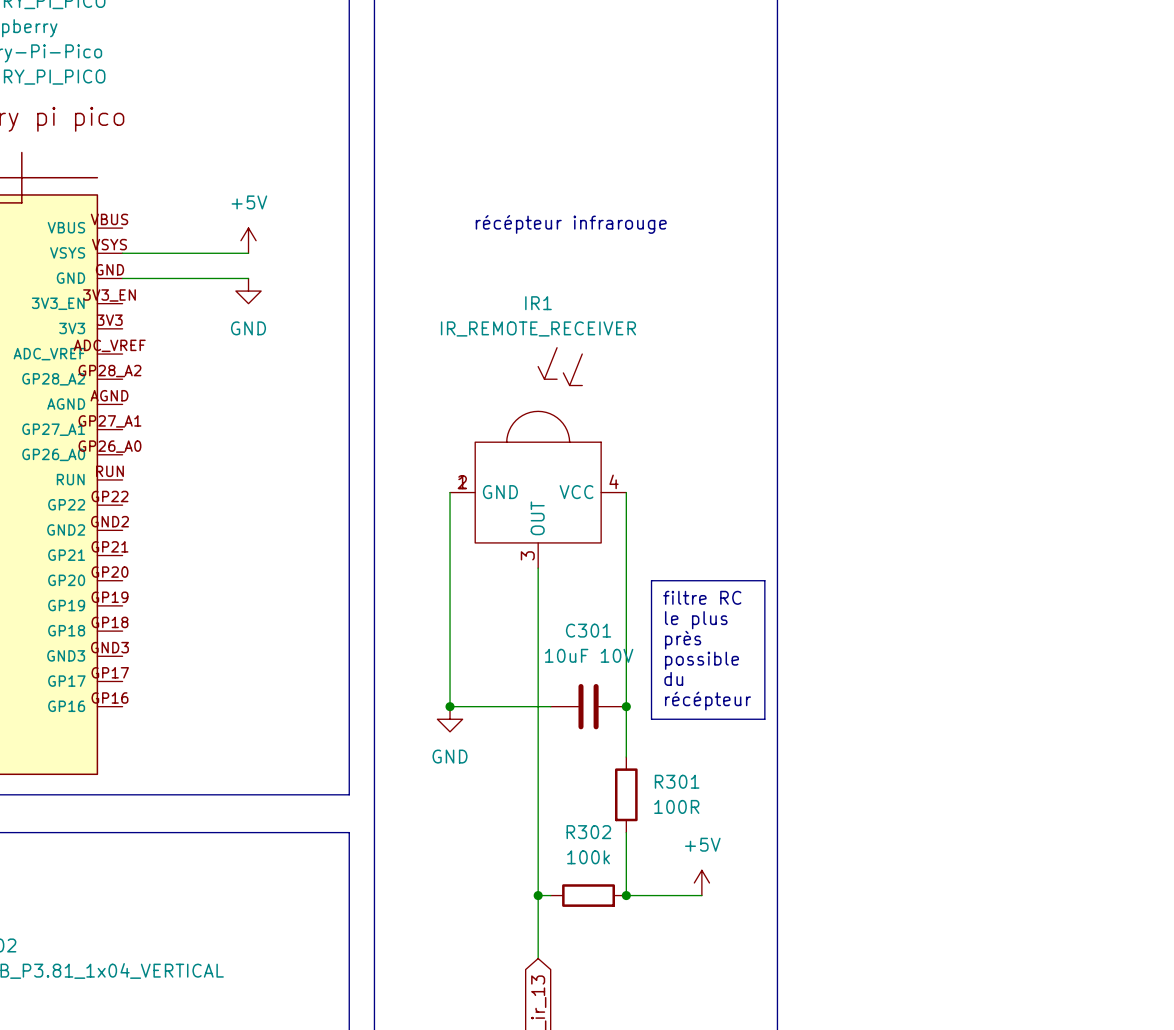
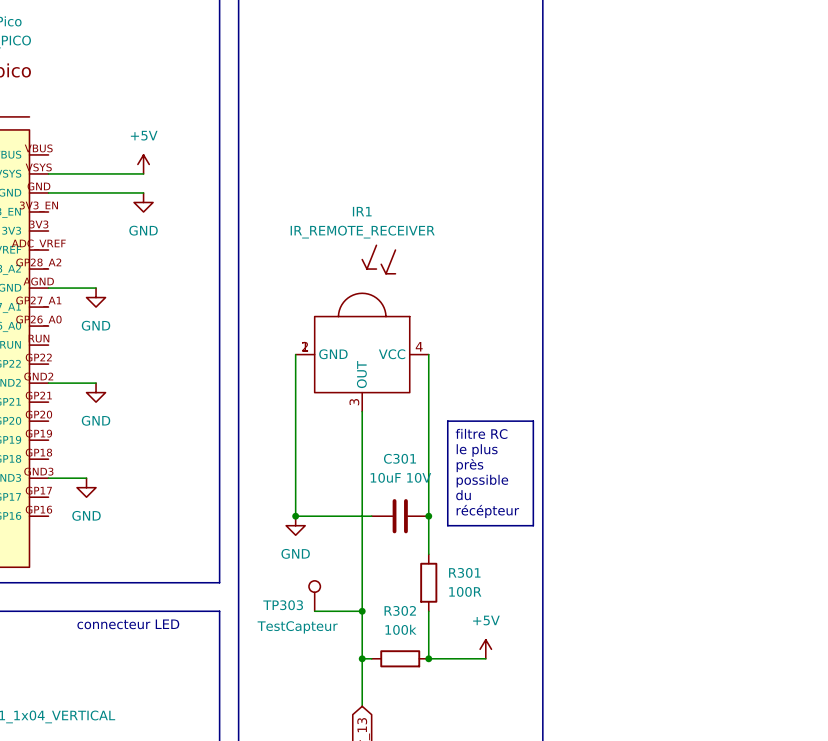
text: récépteur infrarouge (571, 224) -> none
wire: none -> (48, 288) (96, 288)
power symbol: none -> GND (96, 297)
wire: none -> (48, 383) (96, 383)
power symbol: none -> GND (96, 392)
wire: none -> (48, 478) (86, 478)
power symbol: none -> GND (86, 487)
TP303: none -> TestCapteur (314, 596)
wire: none -> (314, 611) (362, 611)
junction: none -> (362, 611)
text: none -> connecteur LED (128, 624)

